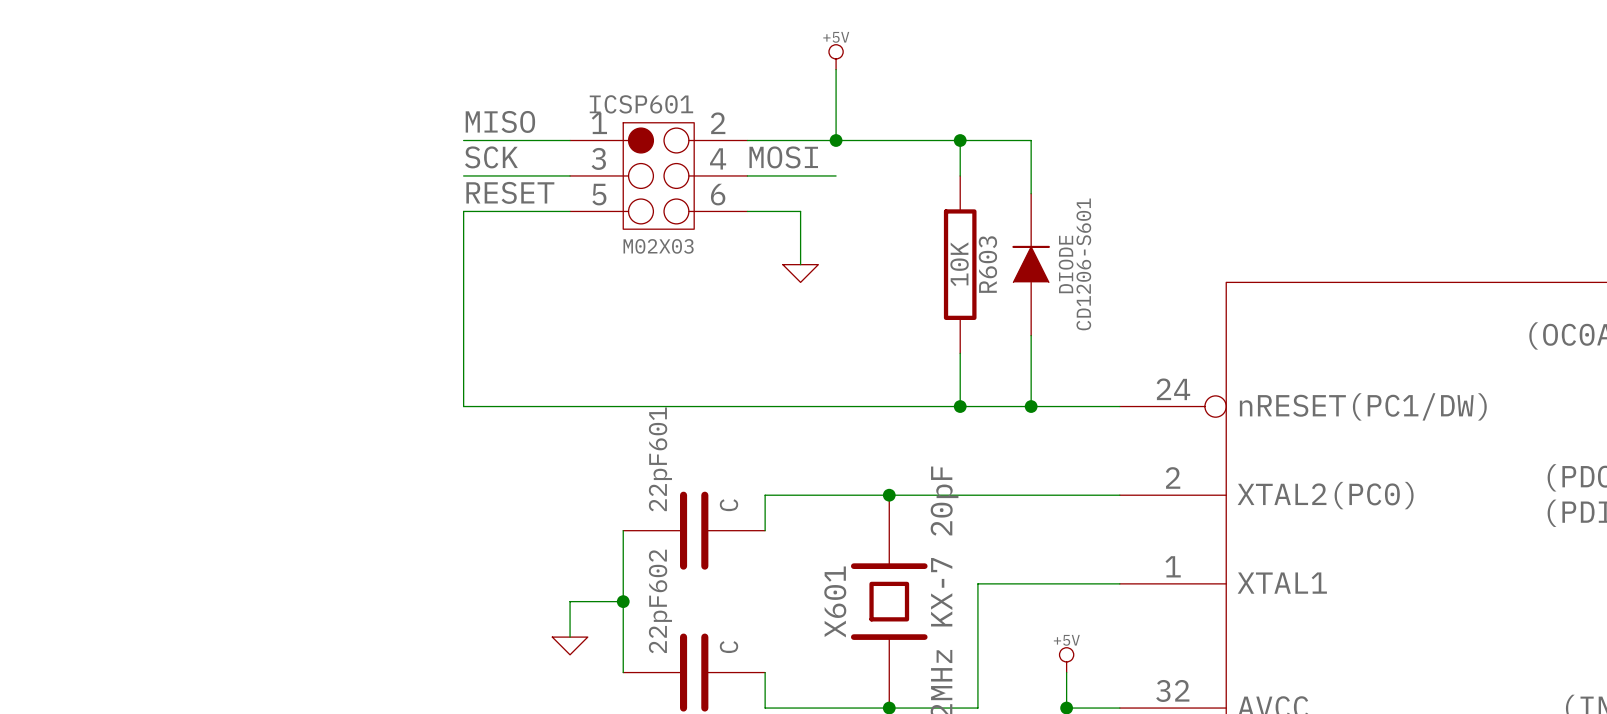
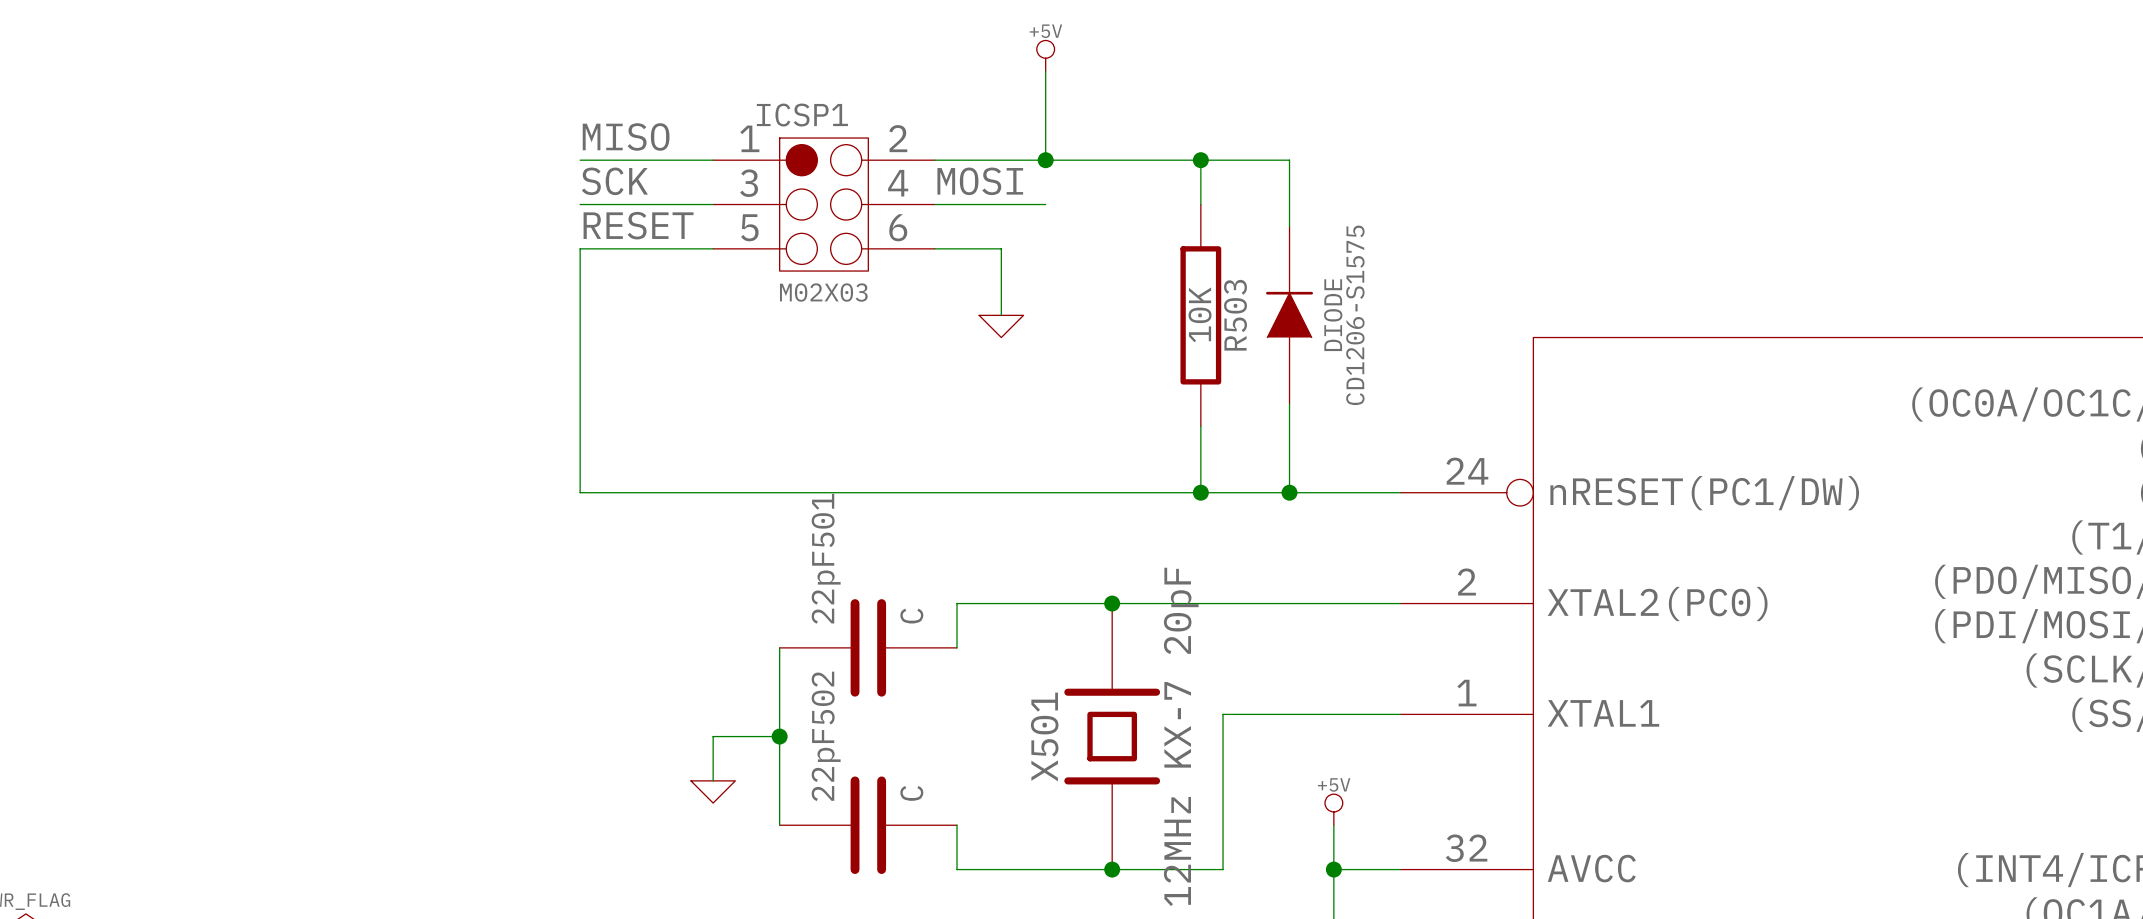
ICSP601 name: ICSP601 (641, 104) -> ICSP1 (802, 115)
R603 name: R603 (987, 264) -> R503 (1235, 315)
CD1206-S601 name: CD1206-S601 (1083, 264) -> CD1206-S1575 (1355, 315)
22pF601 name: 22pF601 (660, 459) -> 22pF501 (826, 558)
22pF602 name: 22pF602 (660, 601) -> 22pF502 (826, 736)
X601 name: X601 (835, 601) -> X501 (1044, 736)

